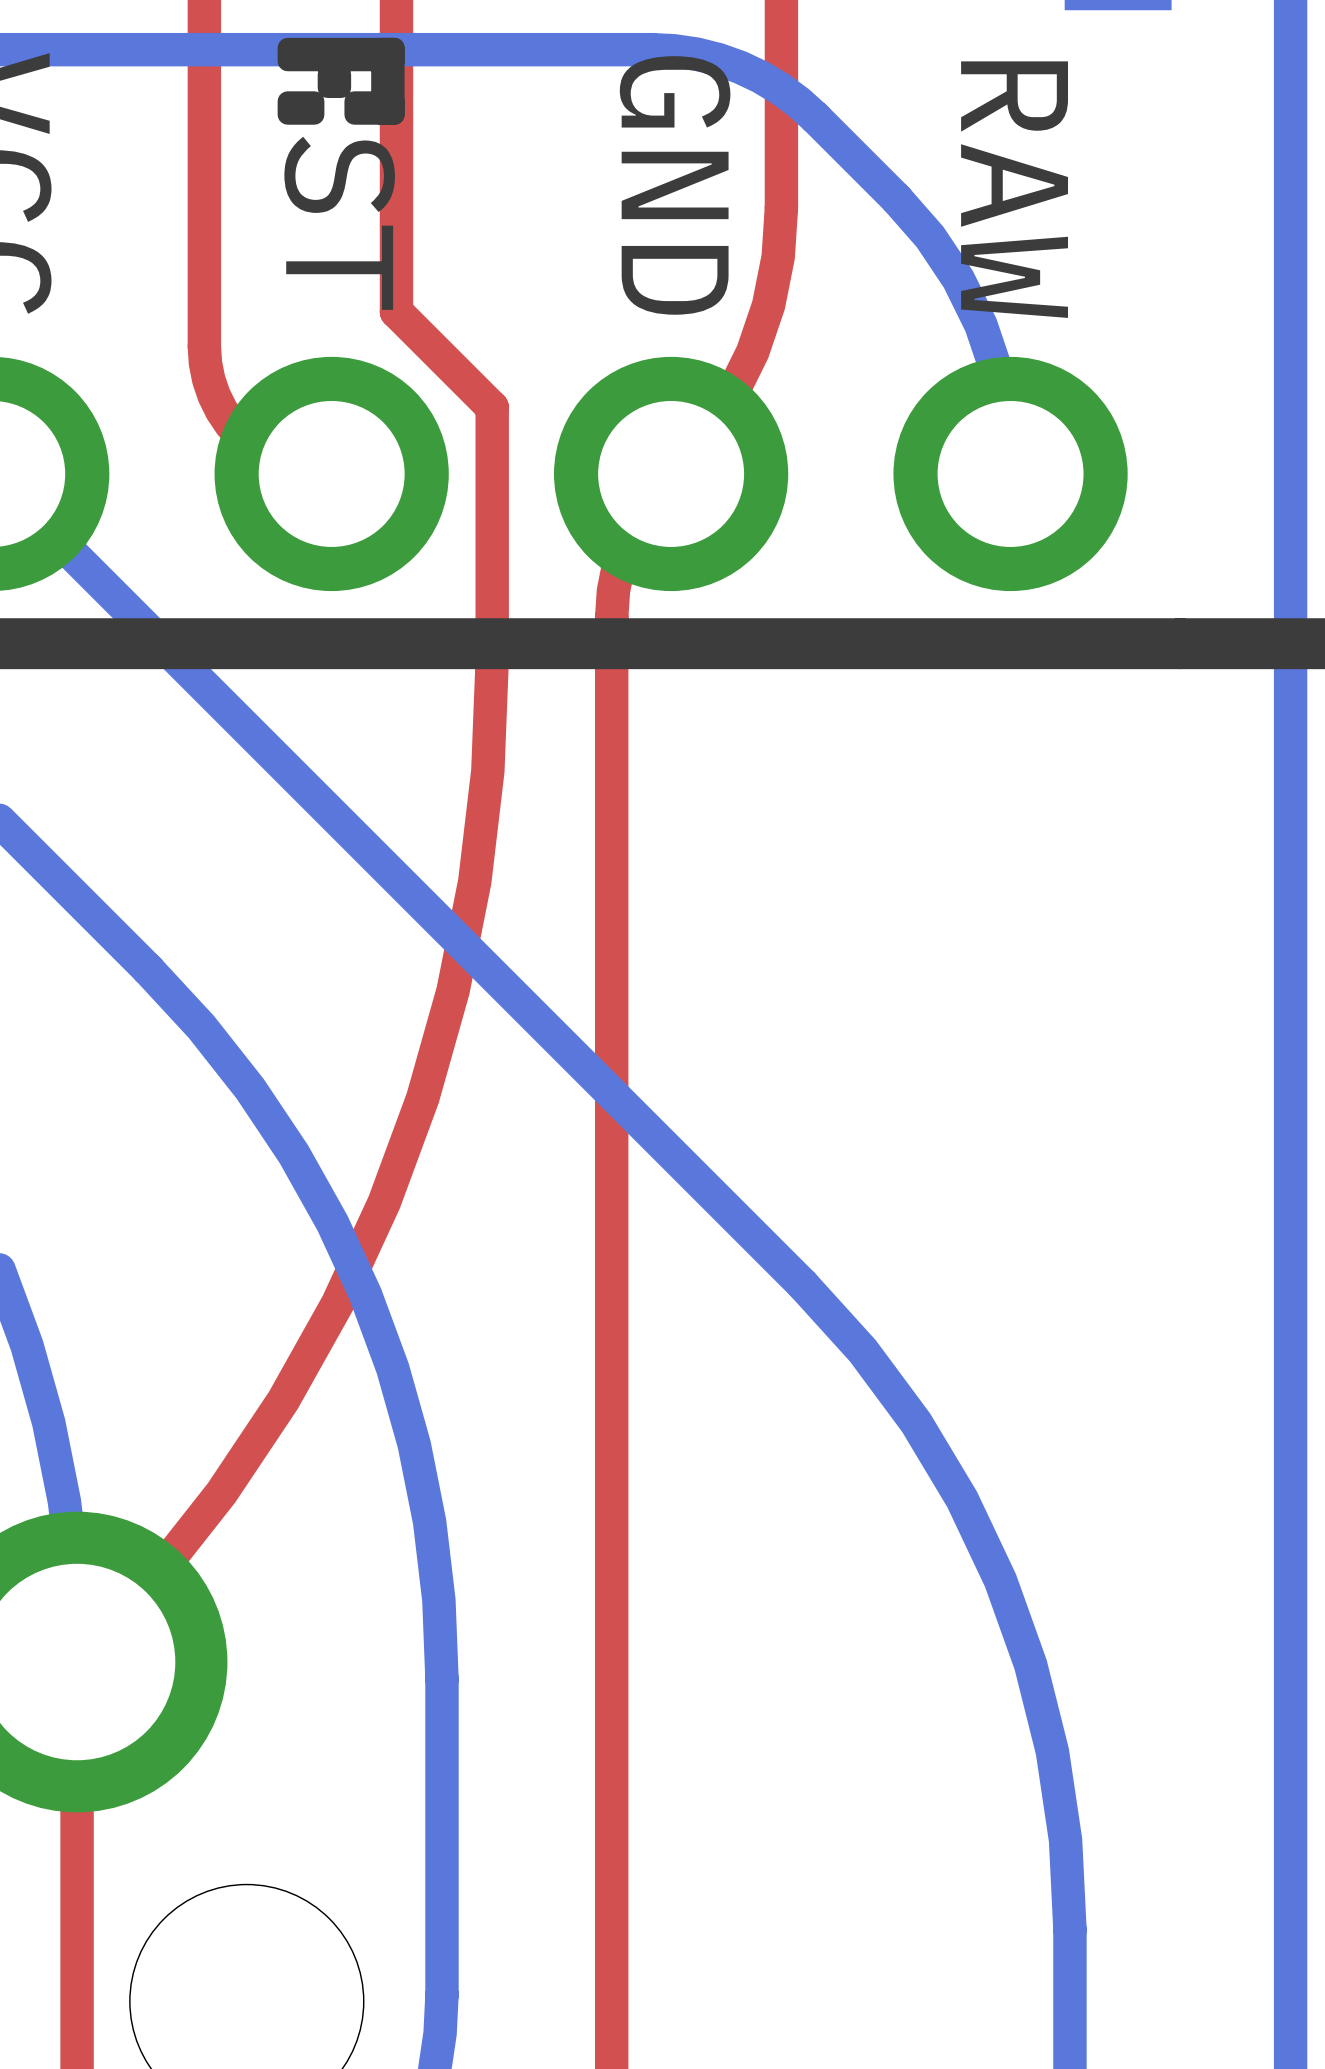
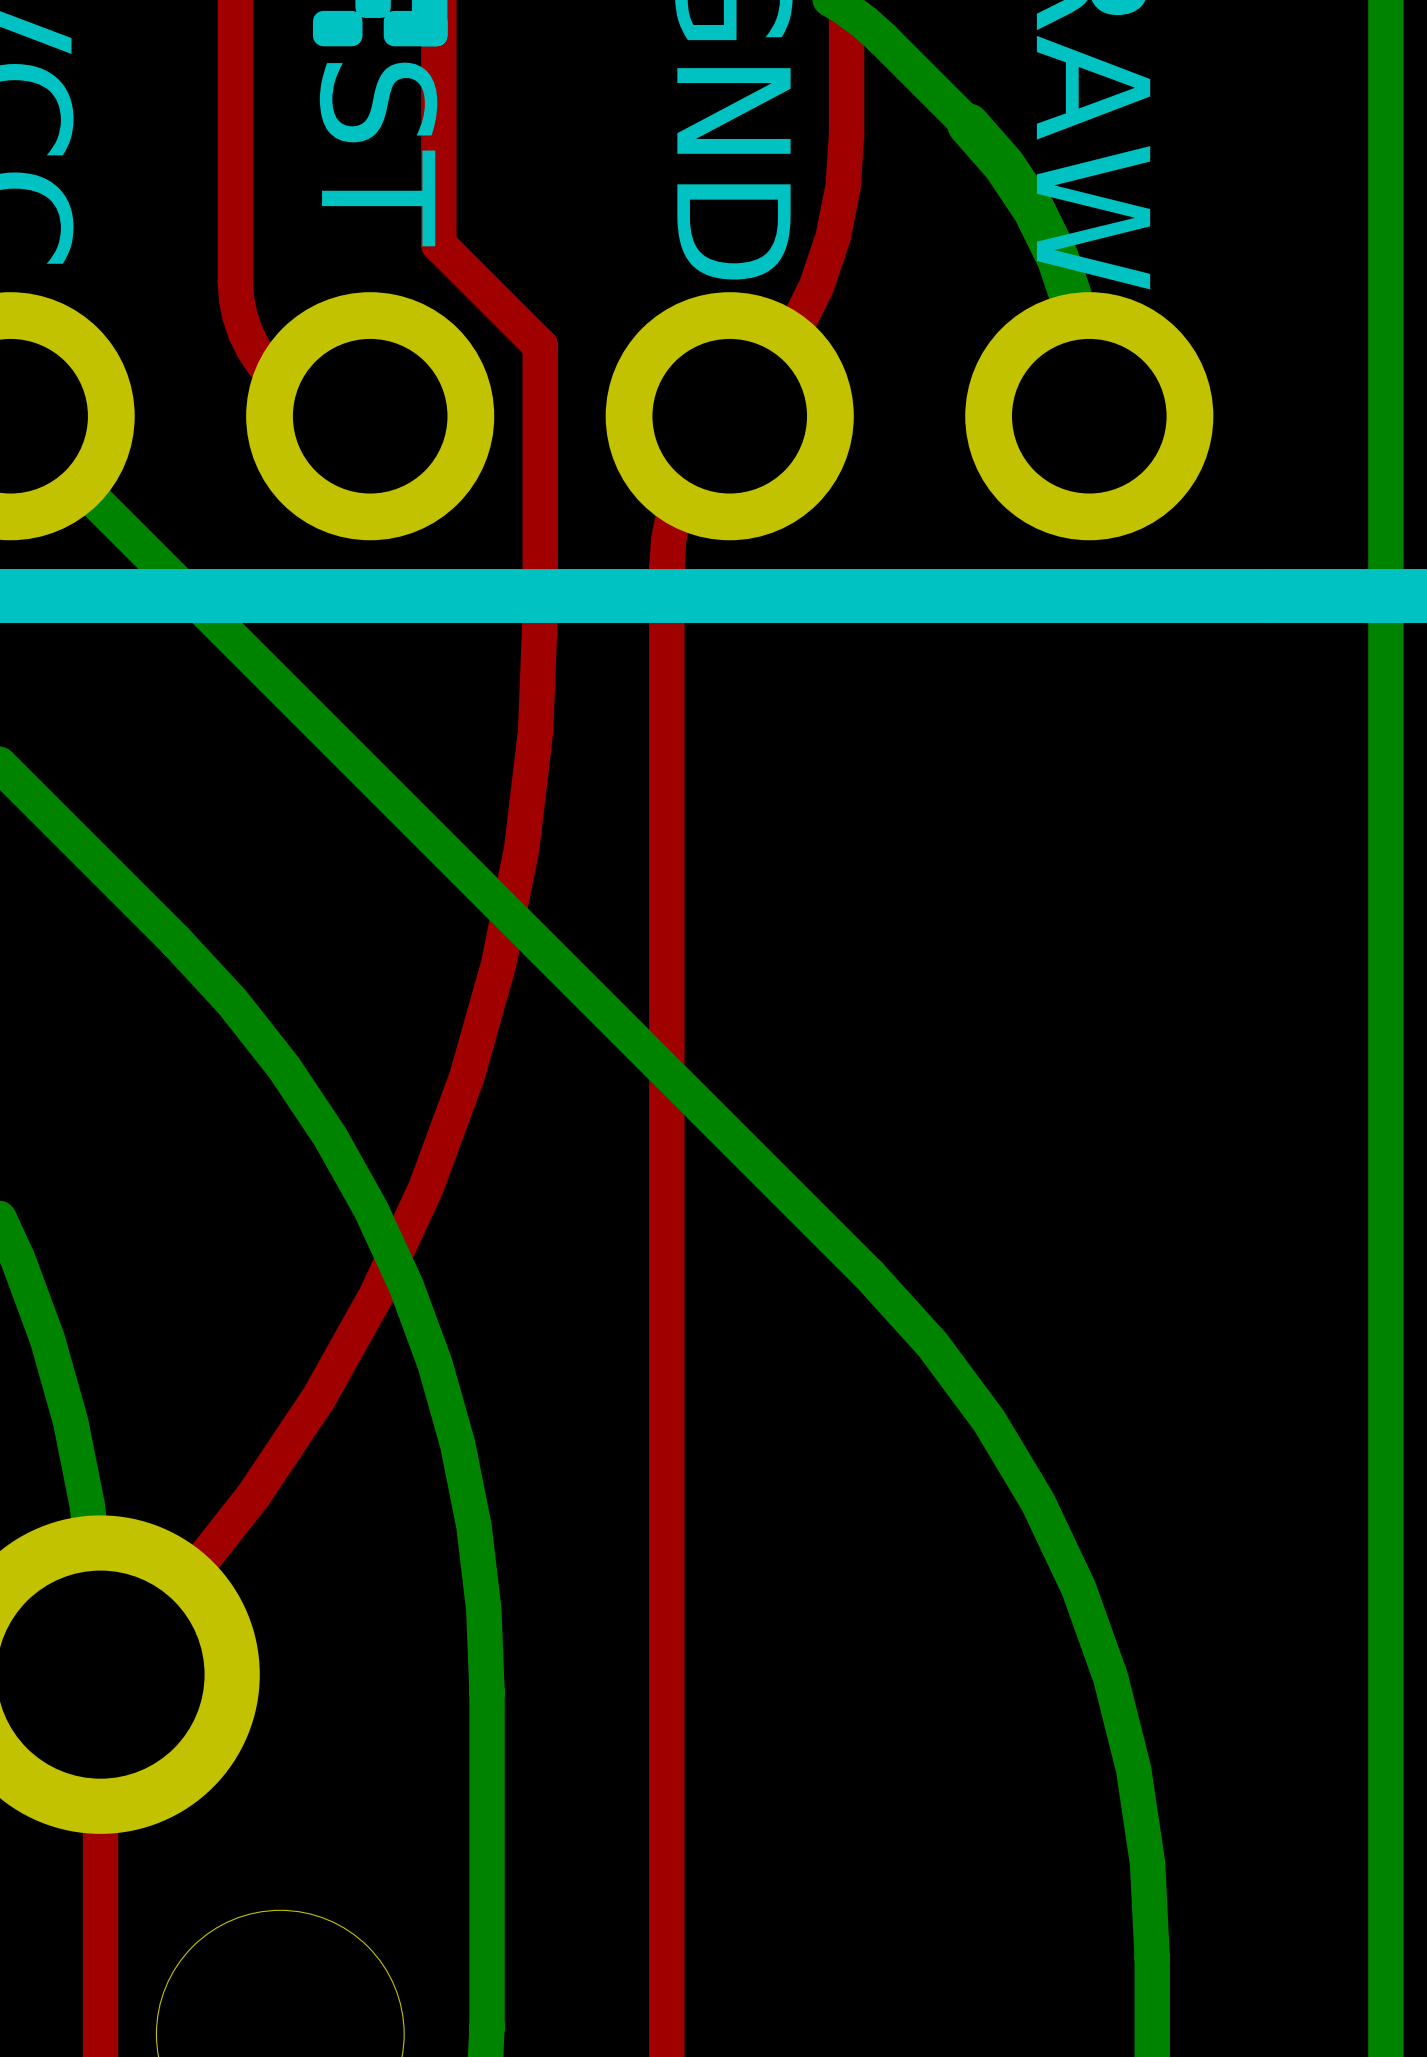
bottom track width: thin (896, 198) (930, 237) (958, 279) (980, 325) (997, 373) (1007, 423) (1010, 473) -> thick (968, 124) (1004, 165) (1034, 210) (1057, 258) (1075, 309) (1085, 362) (1089, 416)

